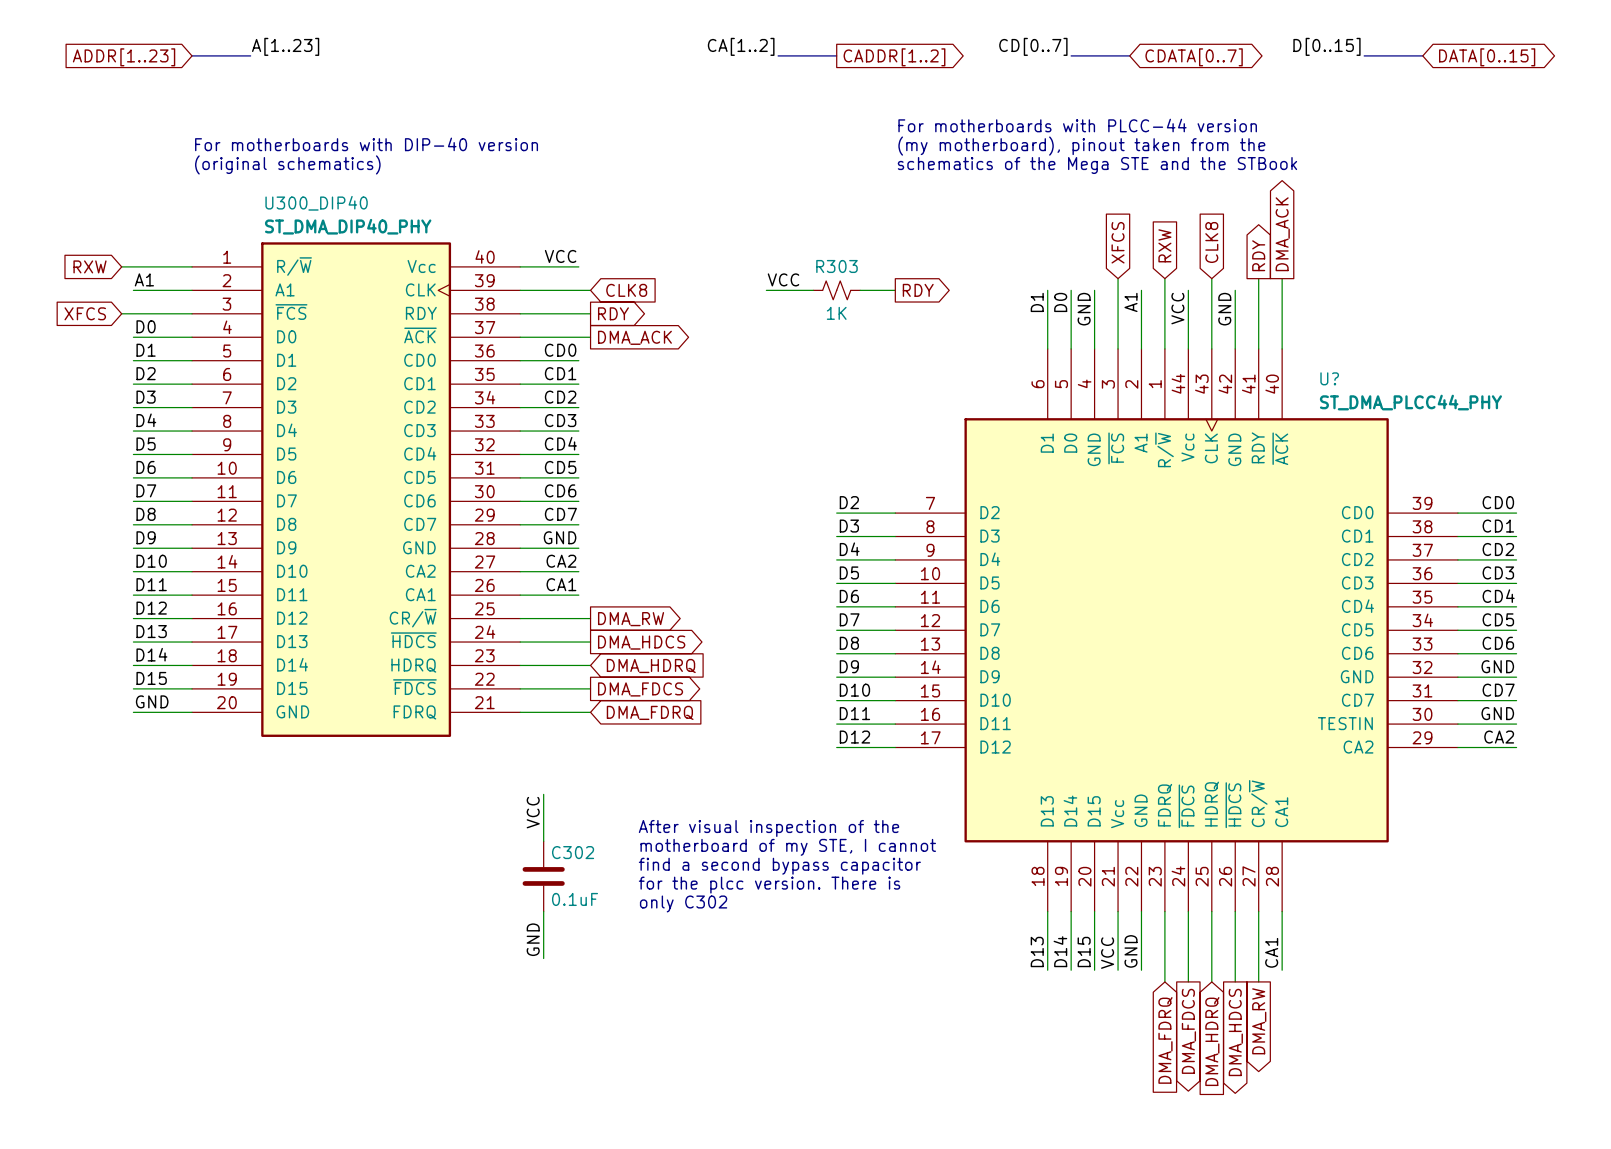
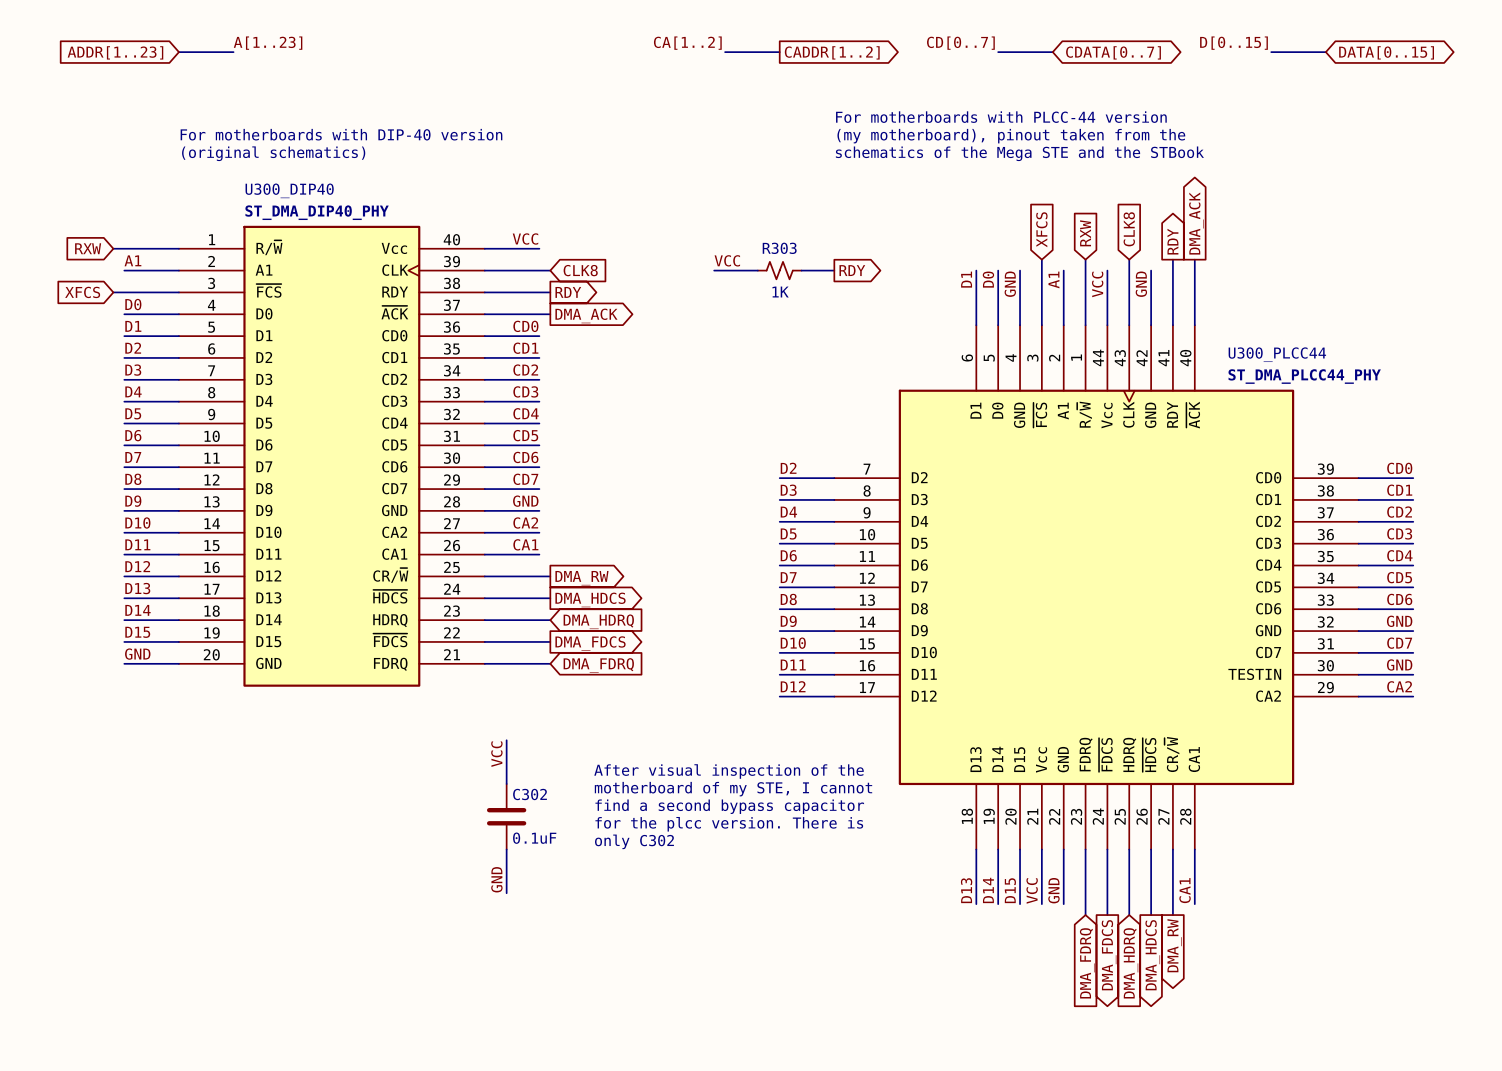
U? name: U? (1329, 378) -> U300_PLCC44 (1277, 354)

